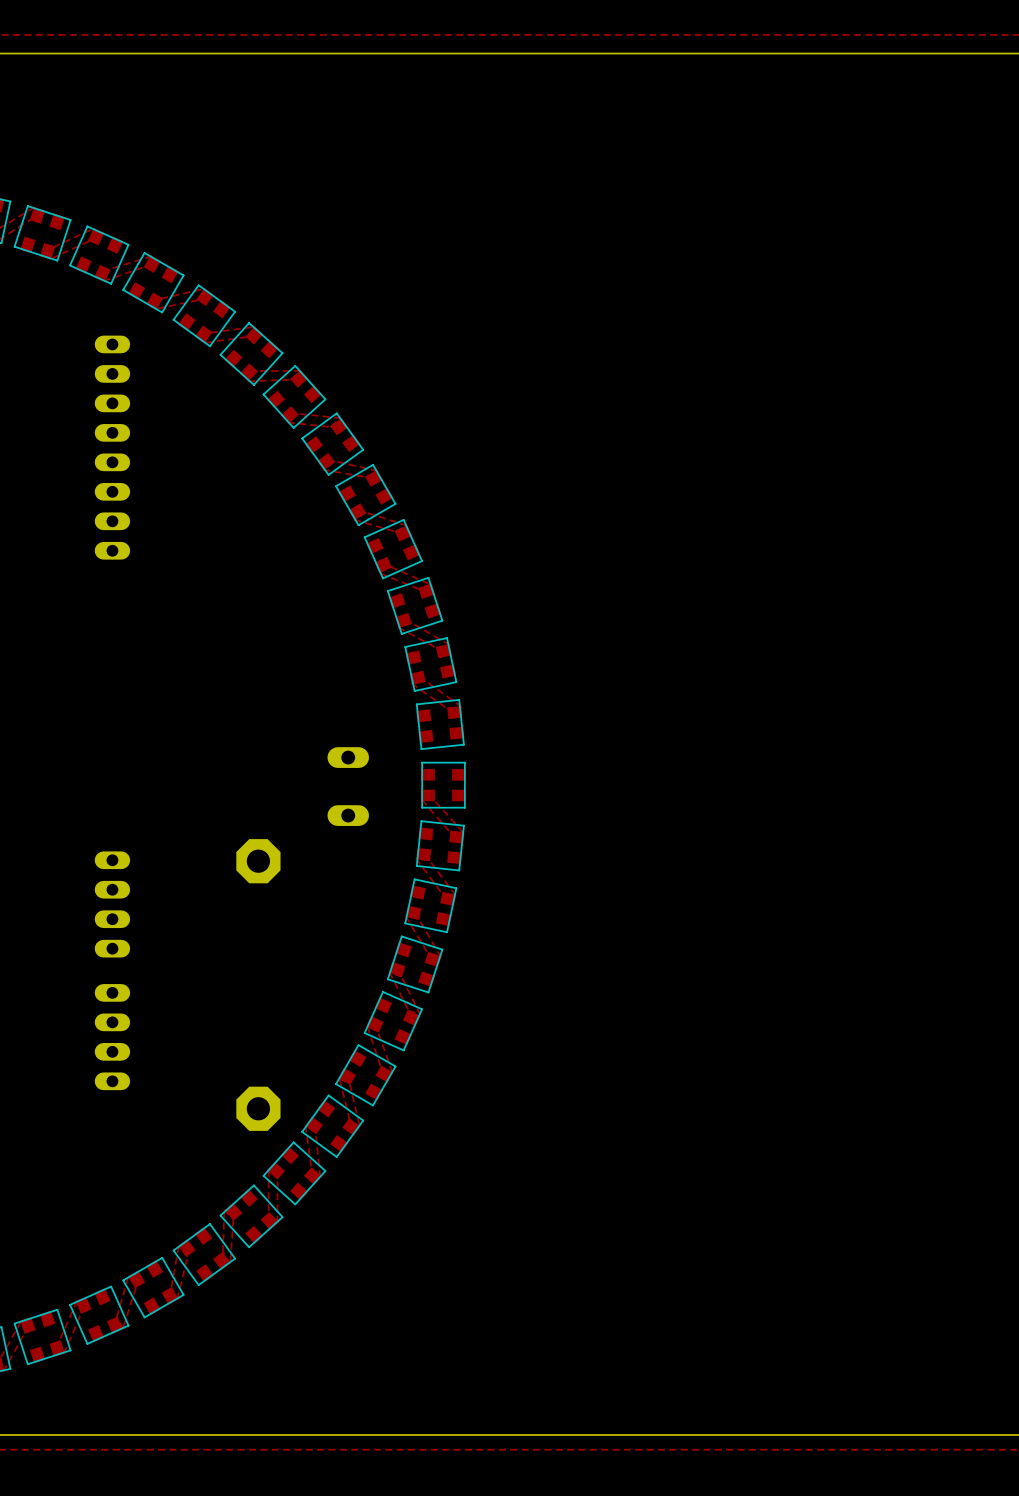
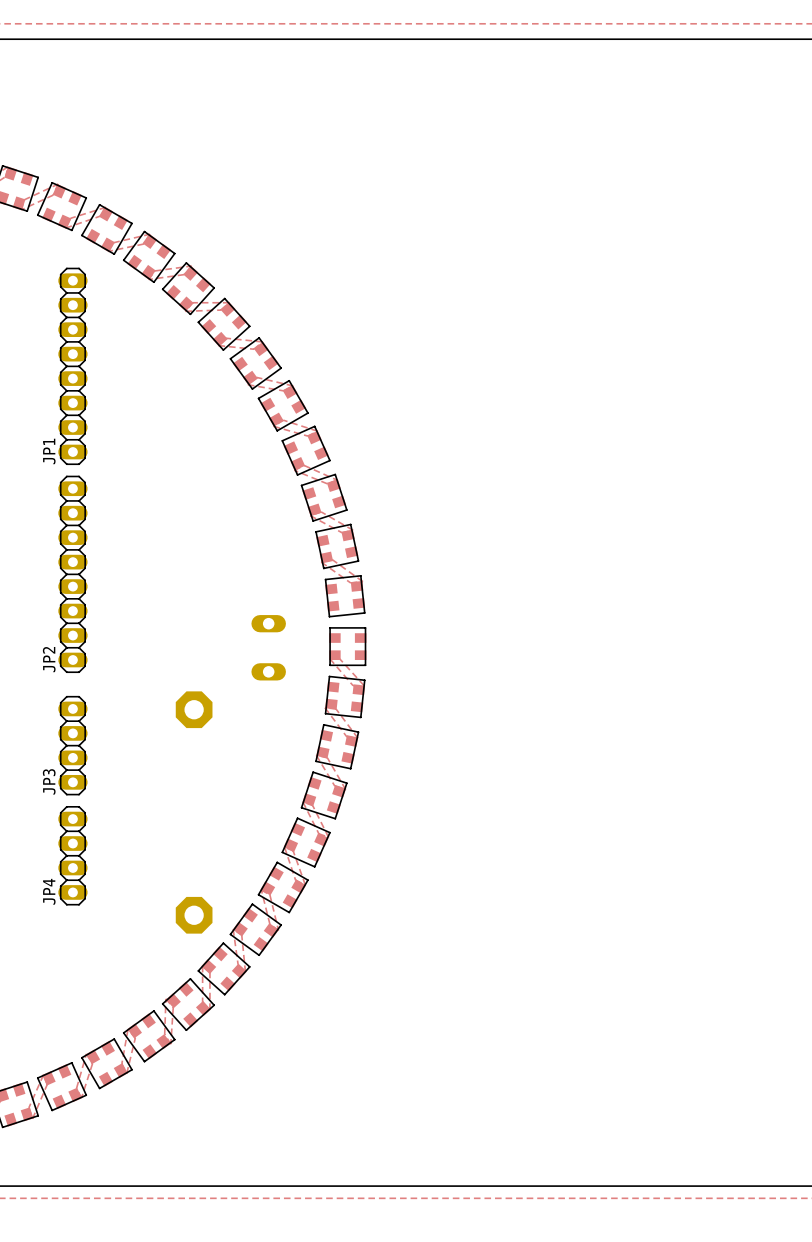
JP2 side: bottom (112, 447) -> top (72, 574)
JP1: none -> (72, 366)
JP3 side: bottom (112, 904) -> top (72, 745)
JP4 side: bottom (112, 1037) -> top (72, 855)

